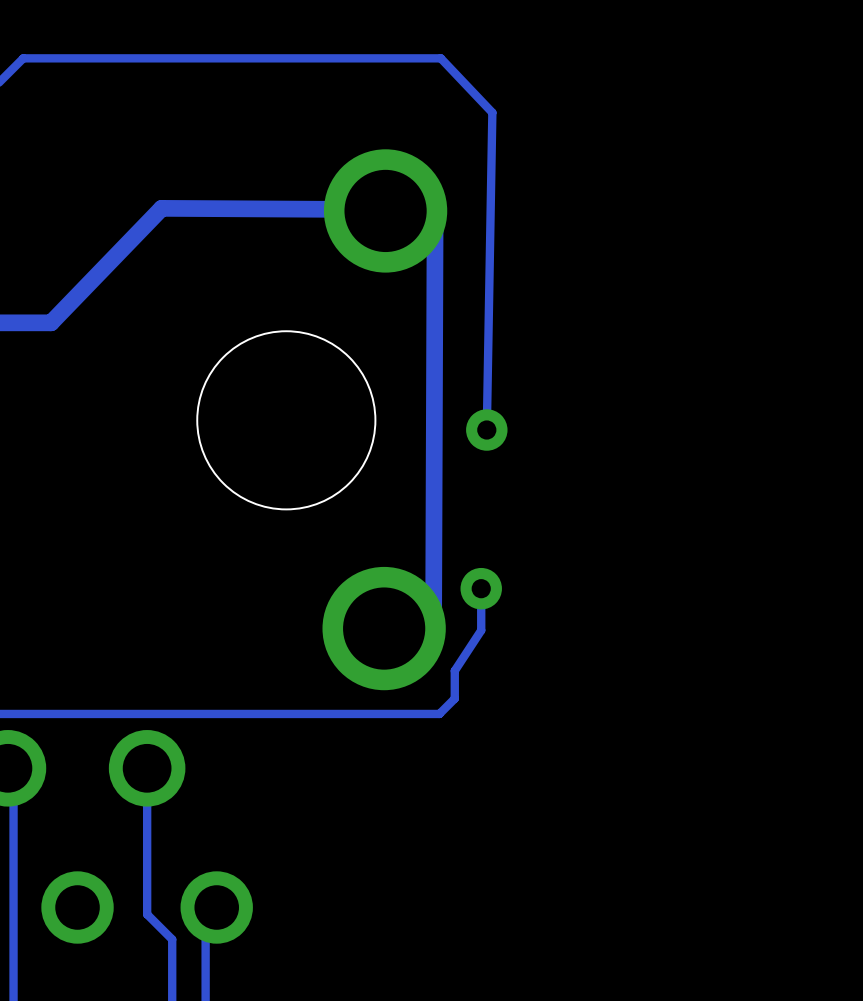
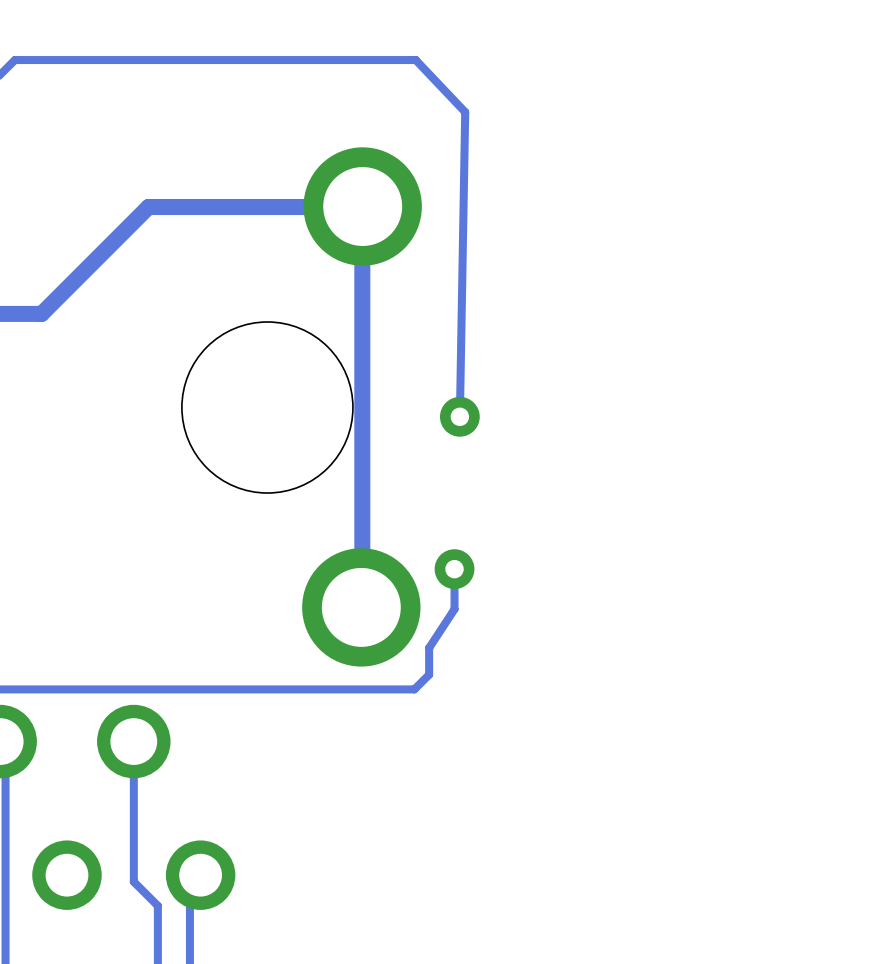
track: none -> (362, 220) (362, 607)
track: (51, 322) (161, 208) (436, 209) (430, 211) (431, 210) (431, 209) (432, 209) (432, 209) (435, 208) (433, 626) -> (41, 313) (148, 207) (348, 207)

